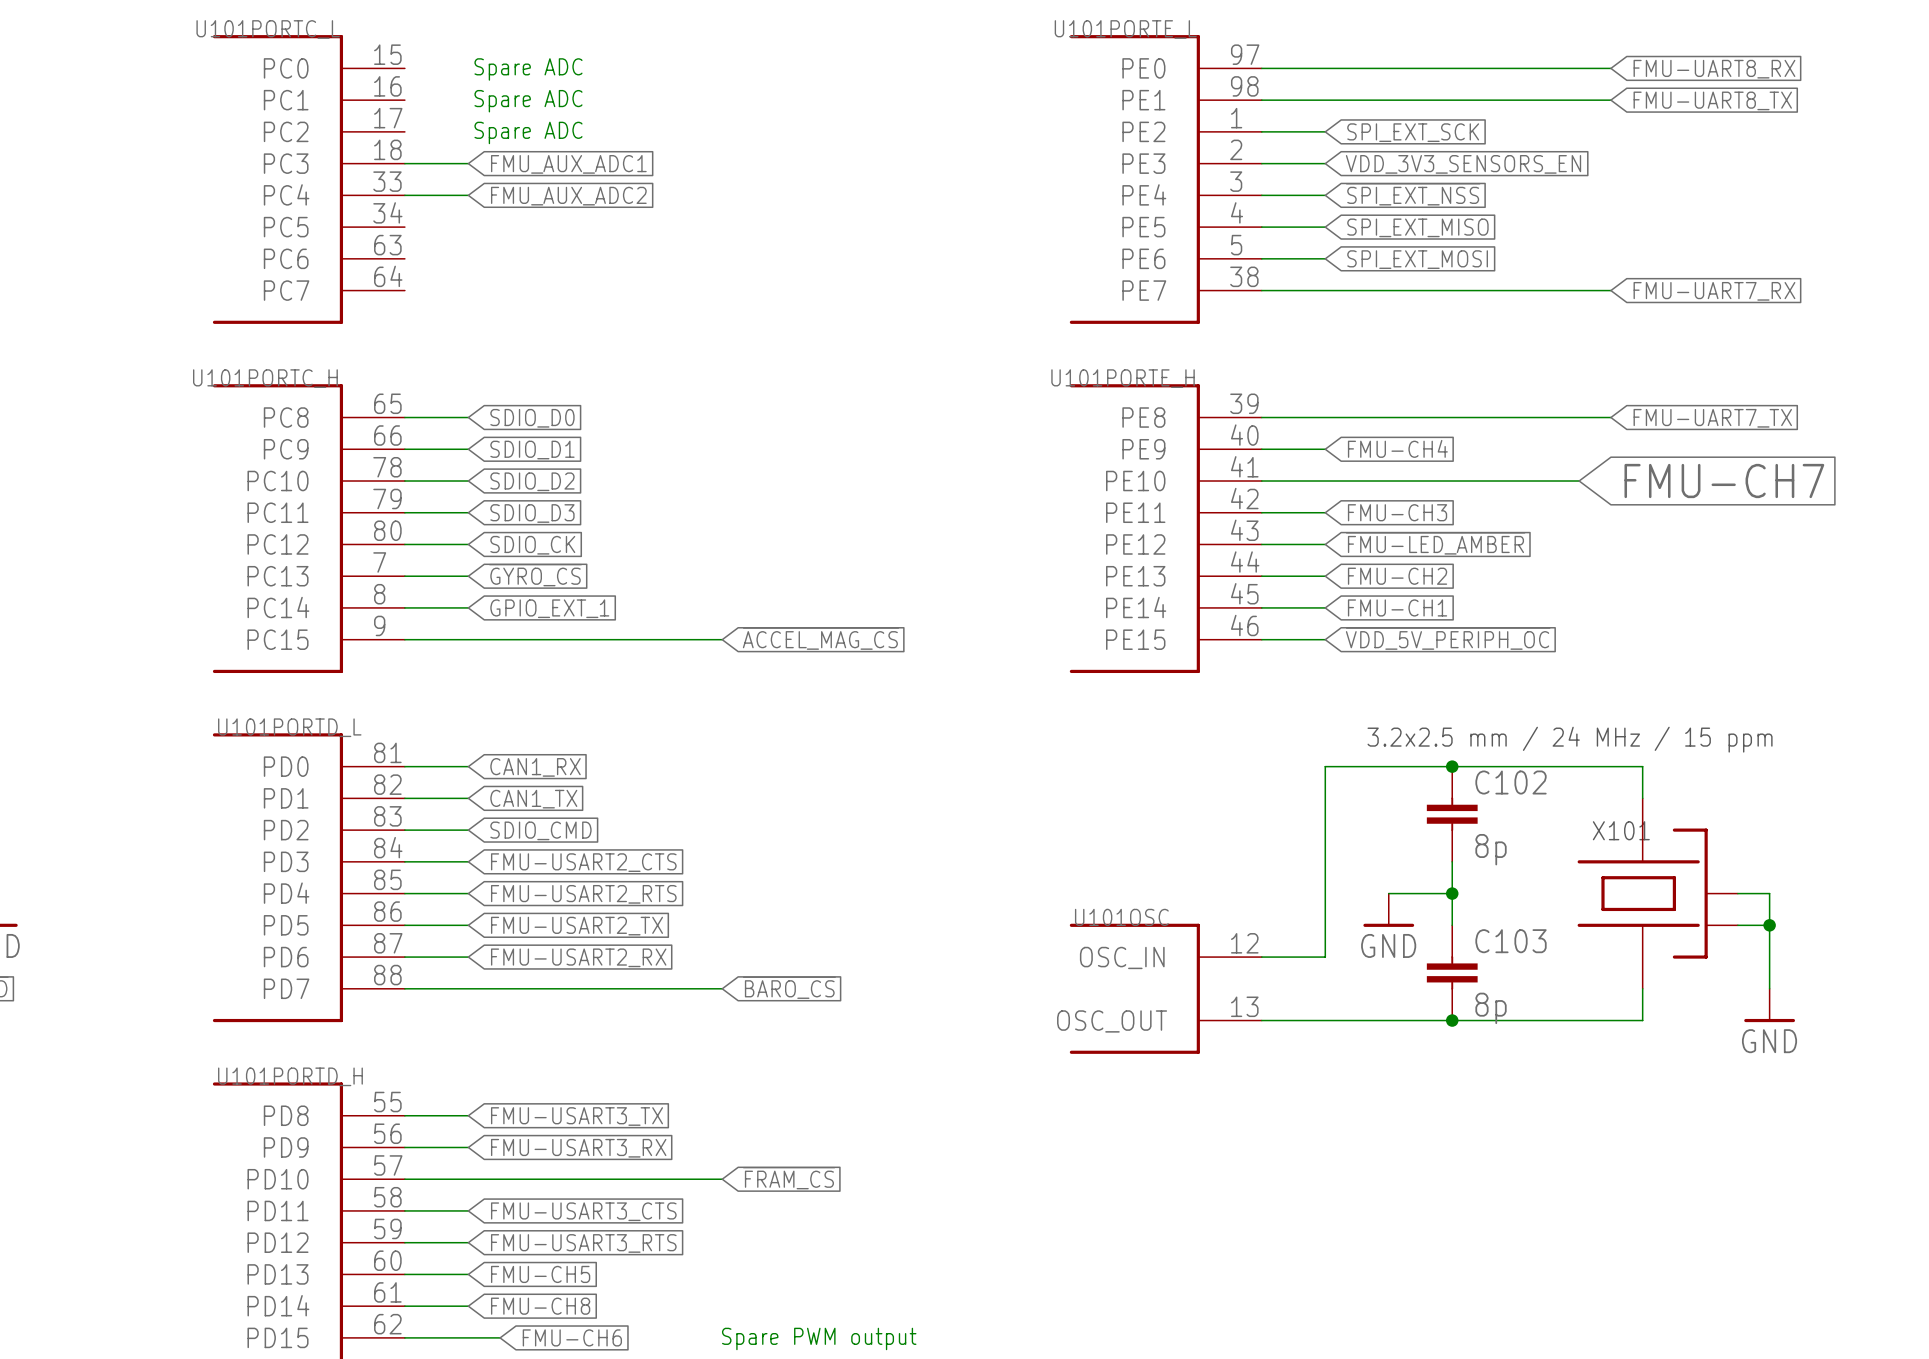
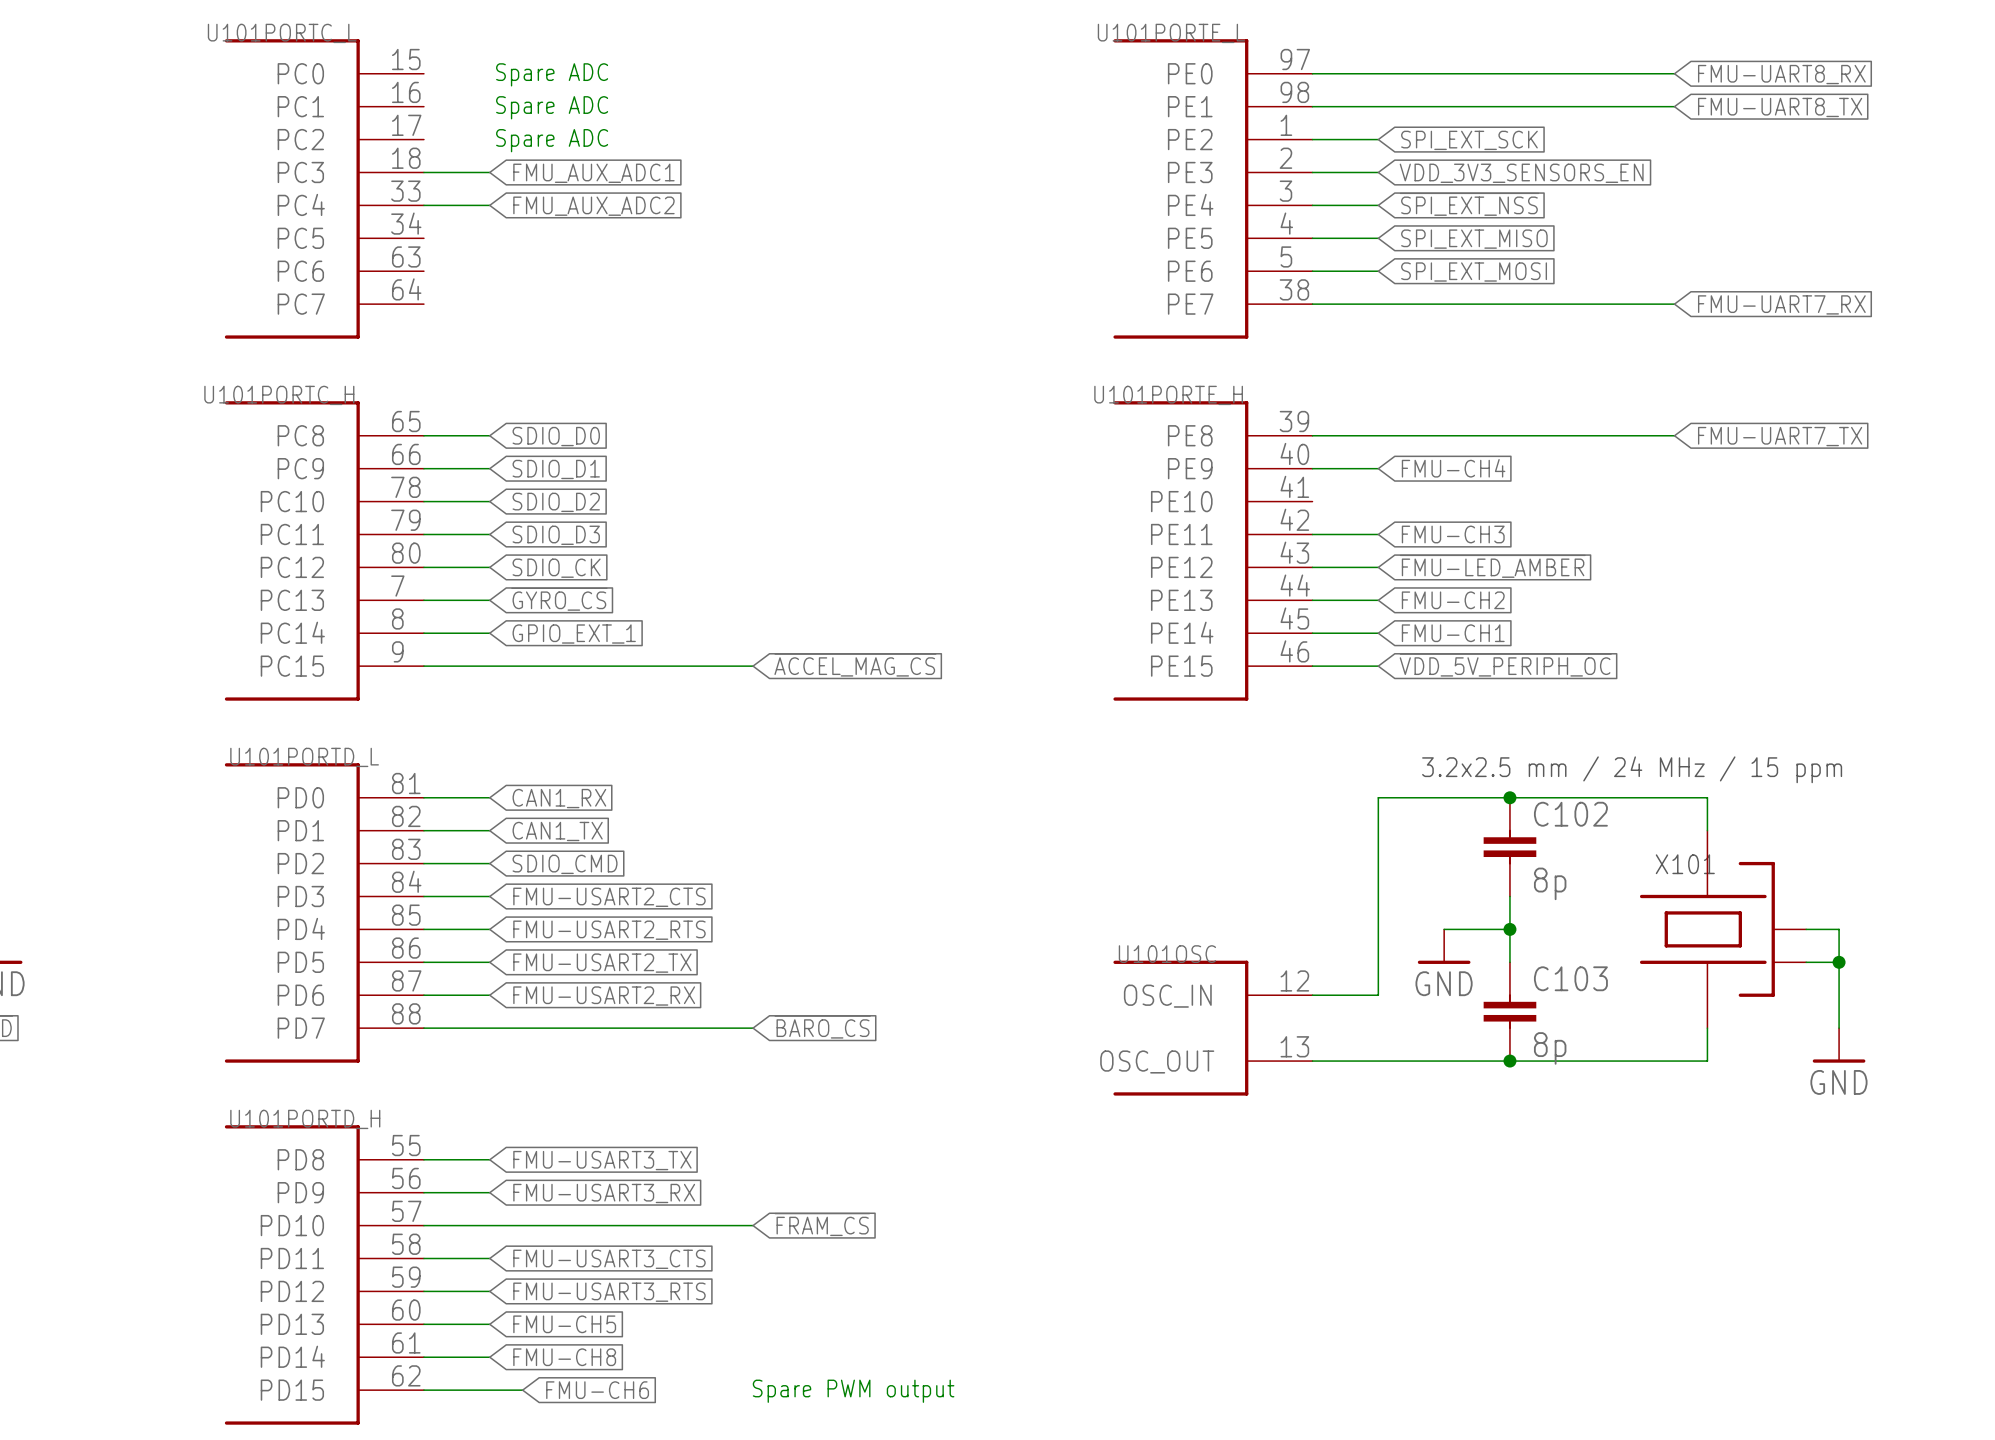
wire: (1261, 481) (1579, 481) -> none
global label: FMU-CH7 (1724, 481) -> none

